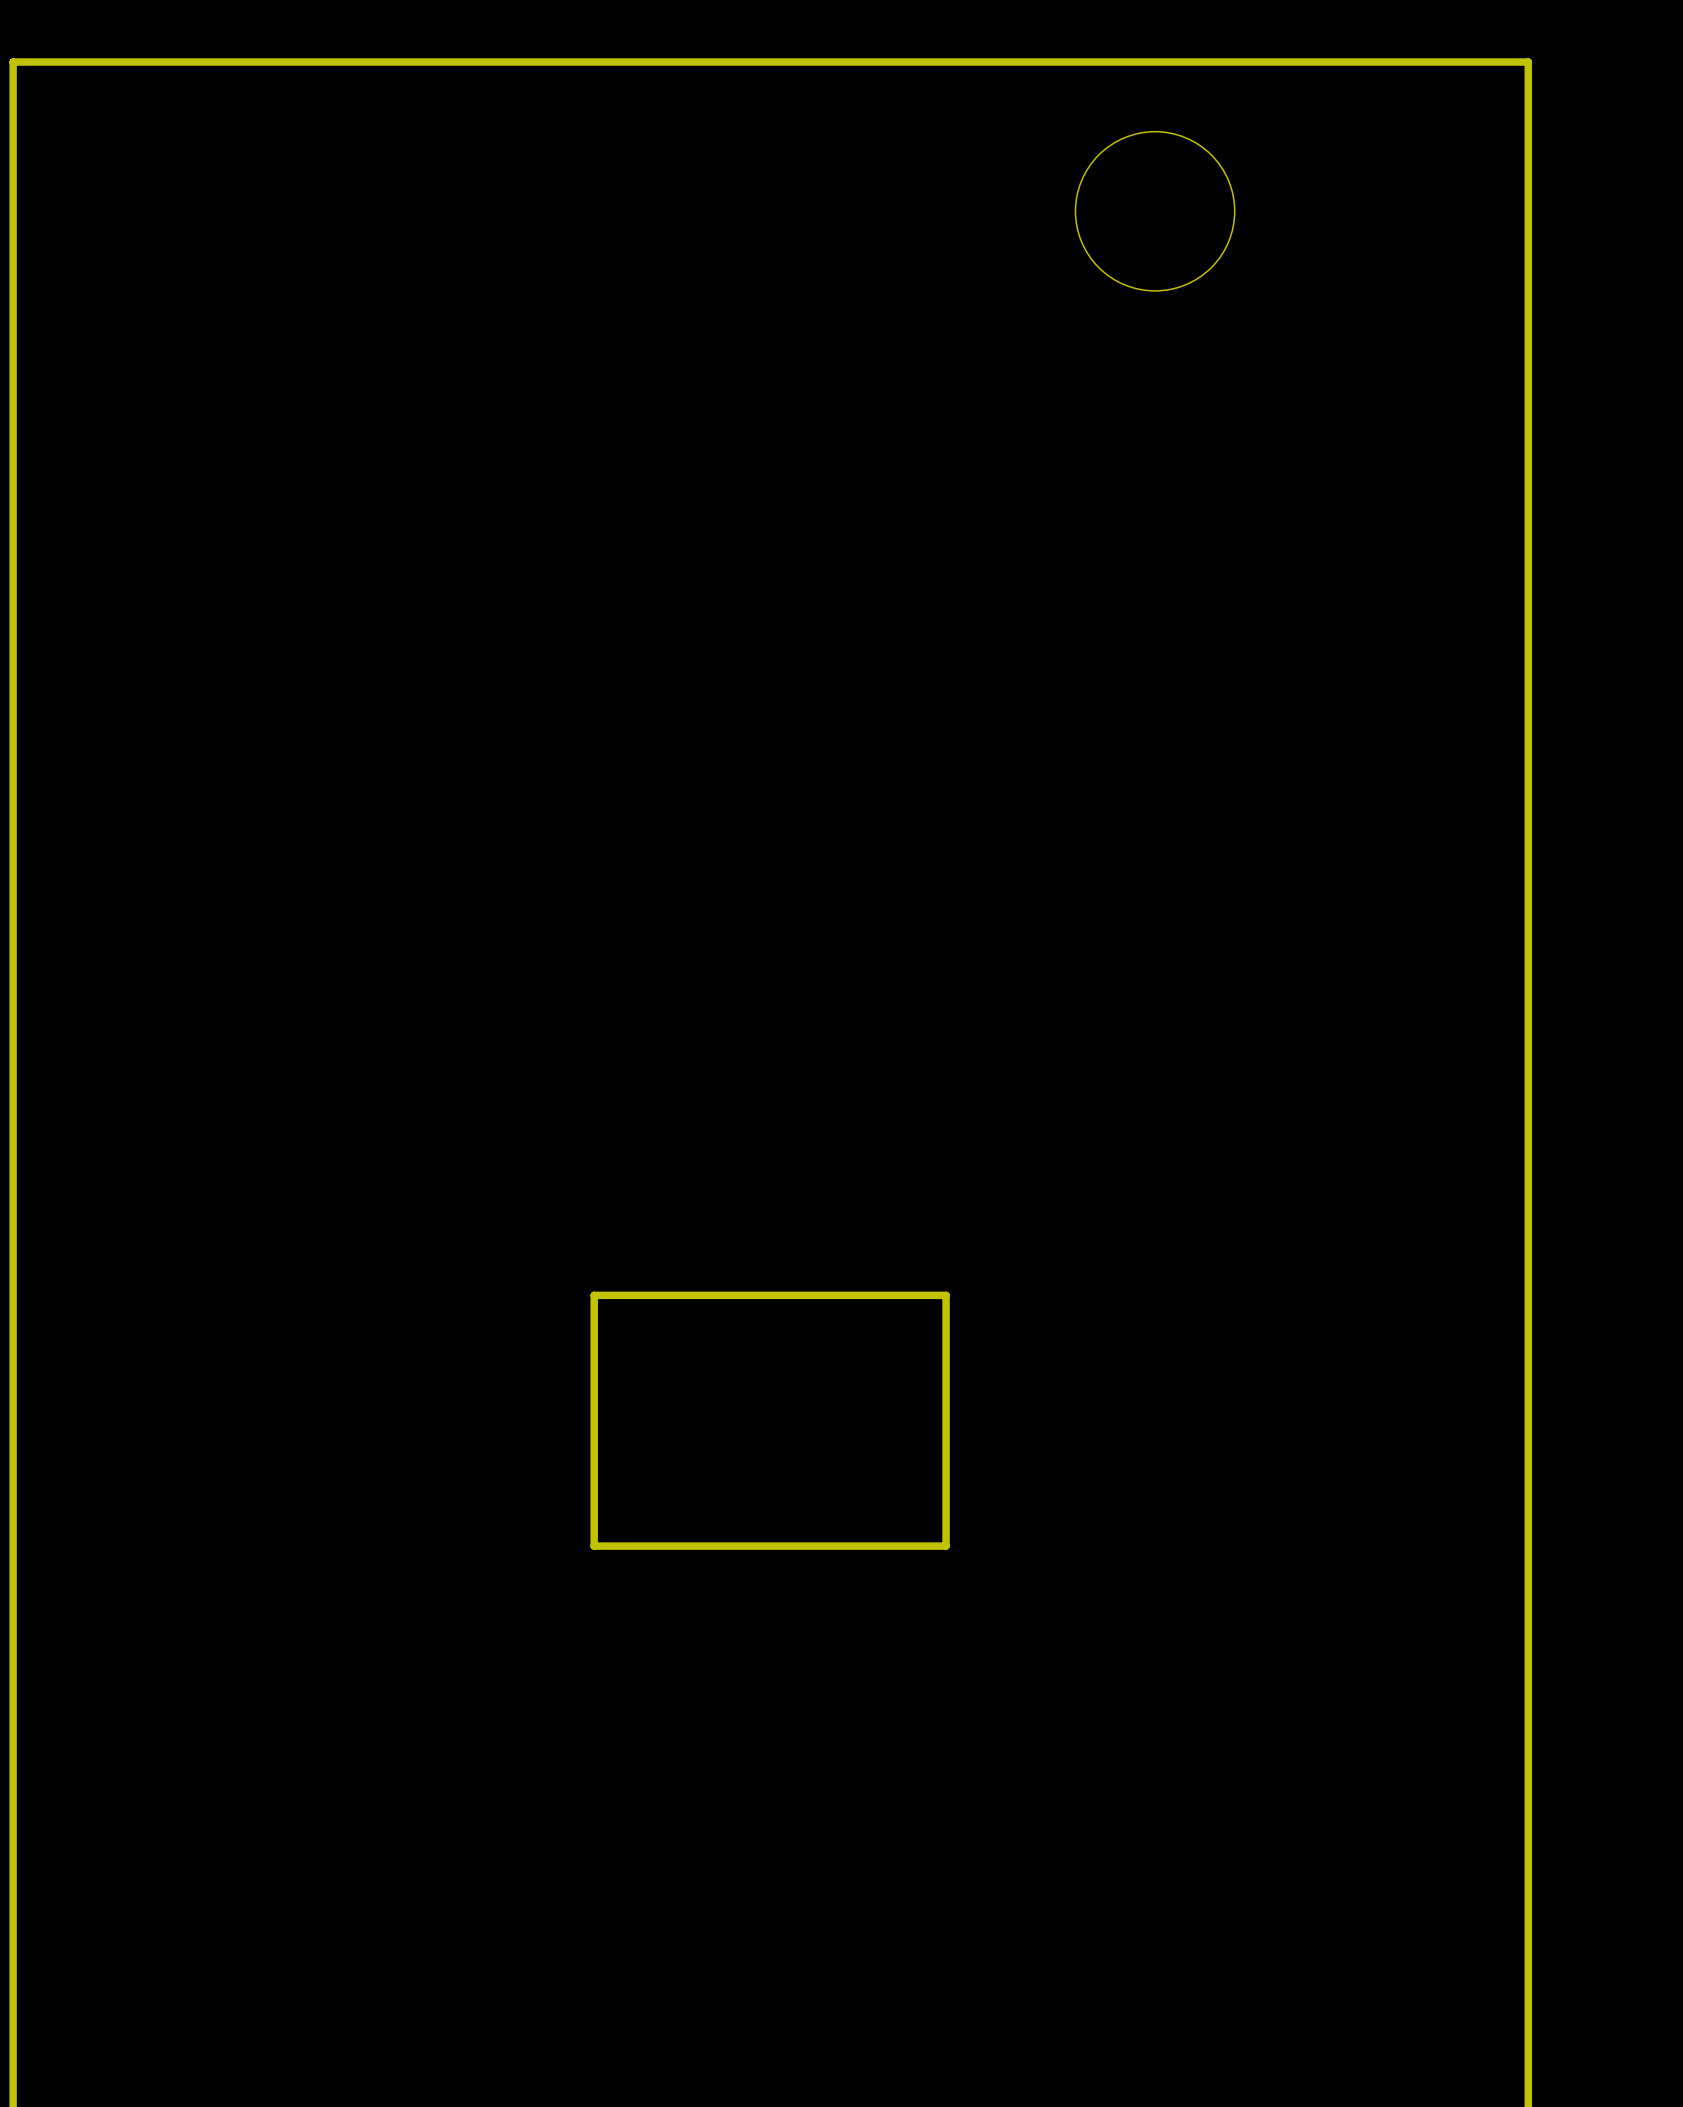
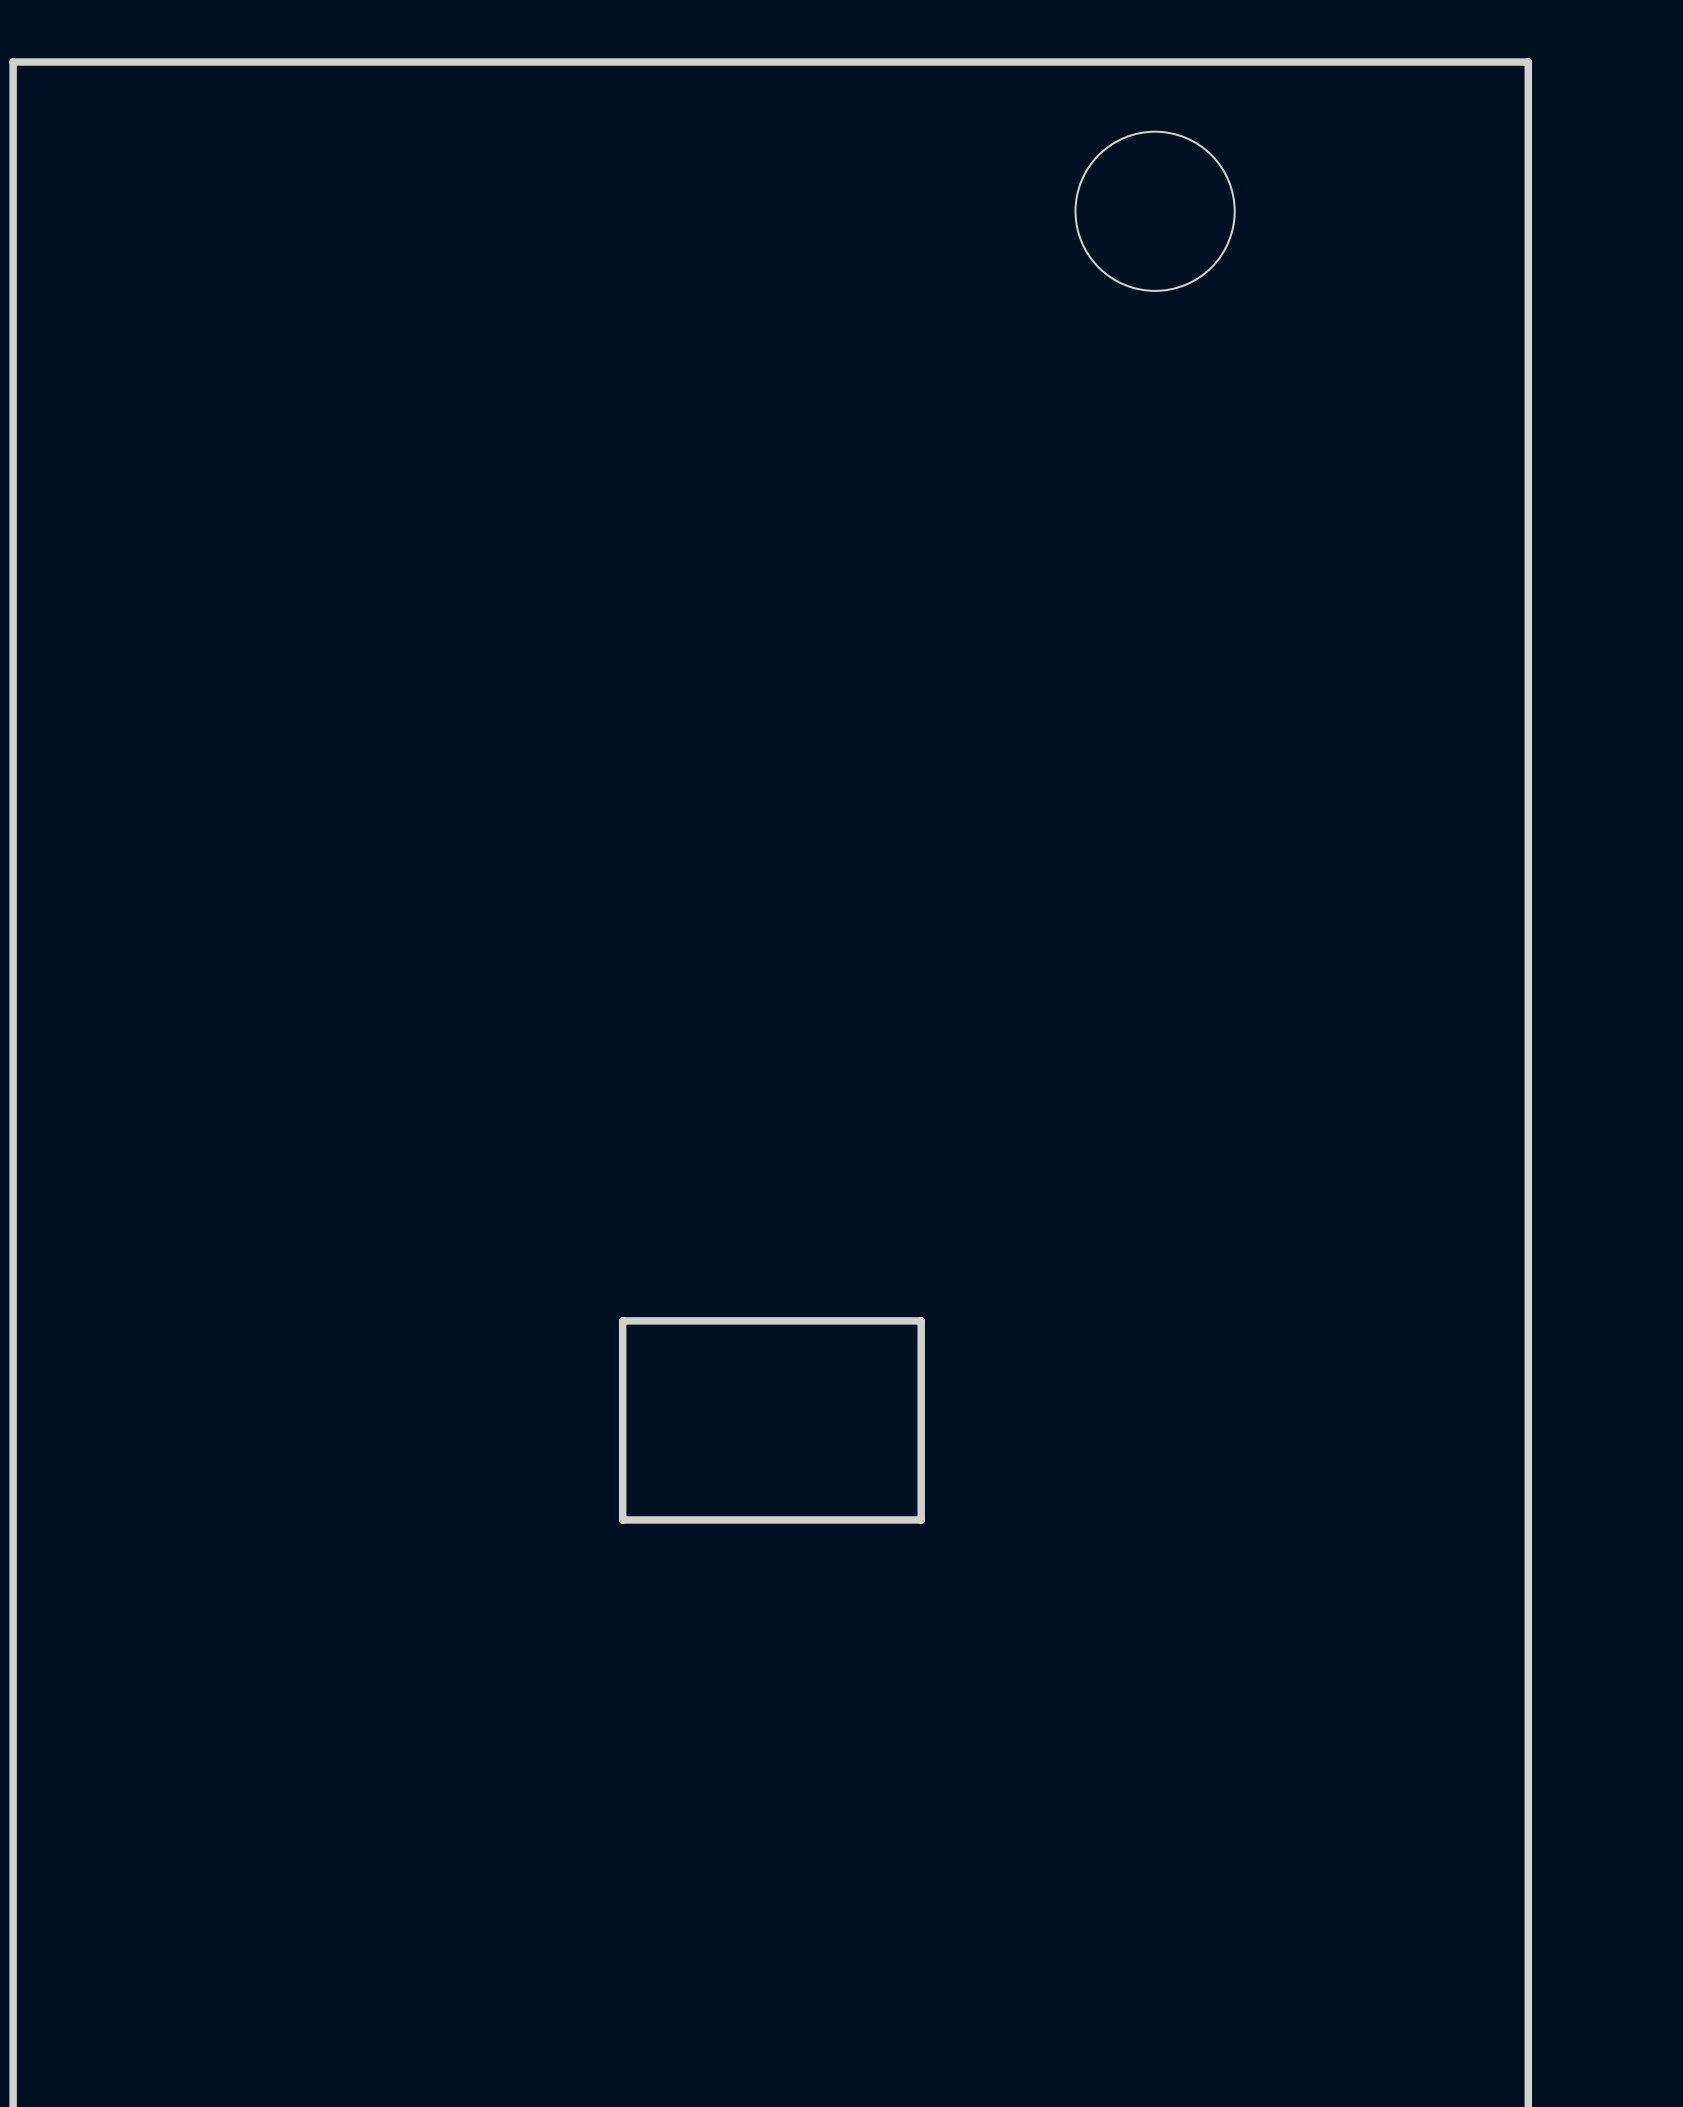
board edge: (946, 1295) (594, 1295) (594, 1546) (945, 1546) (946, 1295) -> (921, 1320) (921, 1519) (622, 1519) (622, 1320) (921, 1320)

